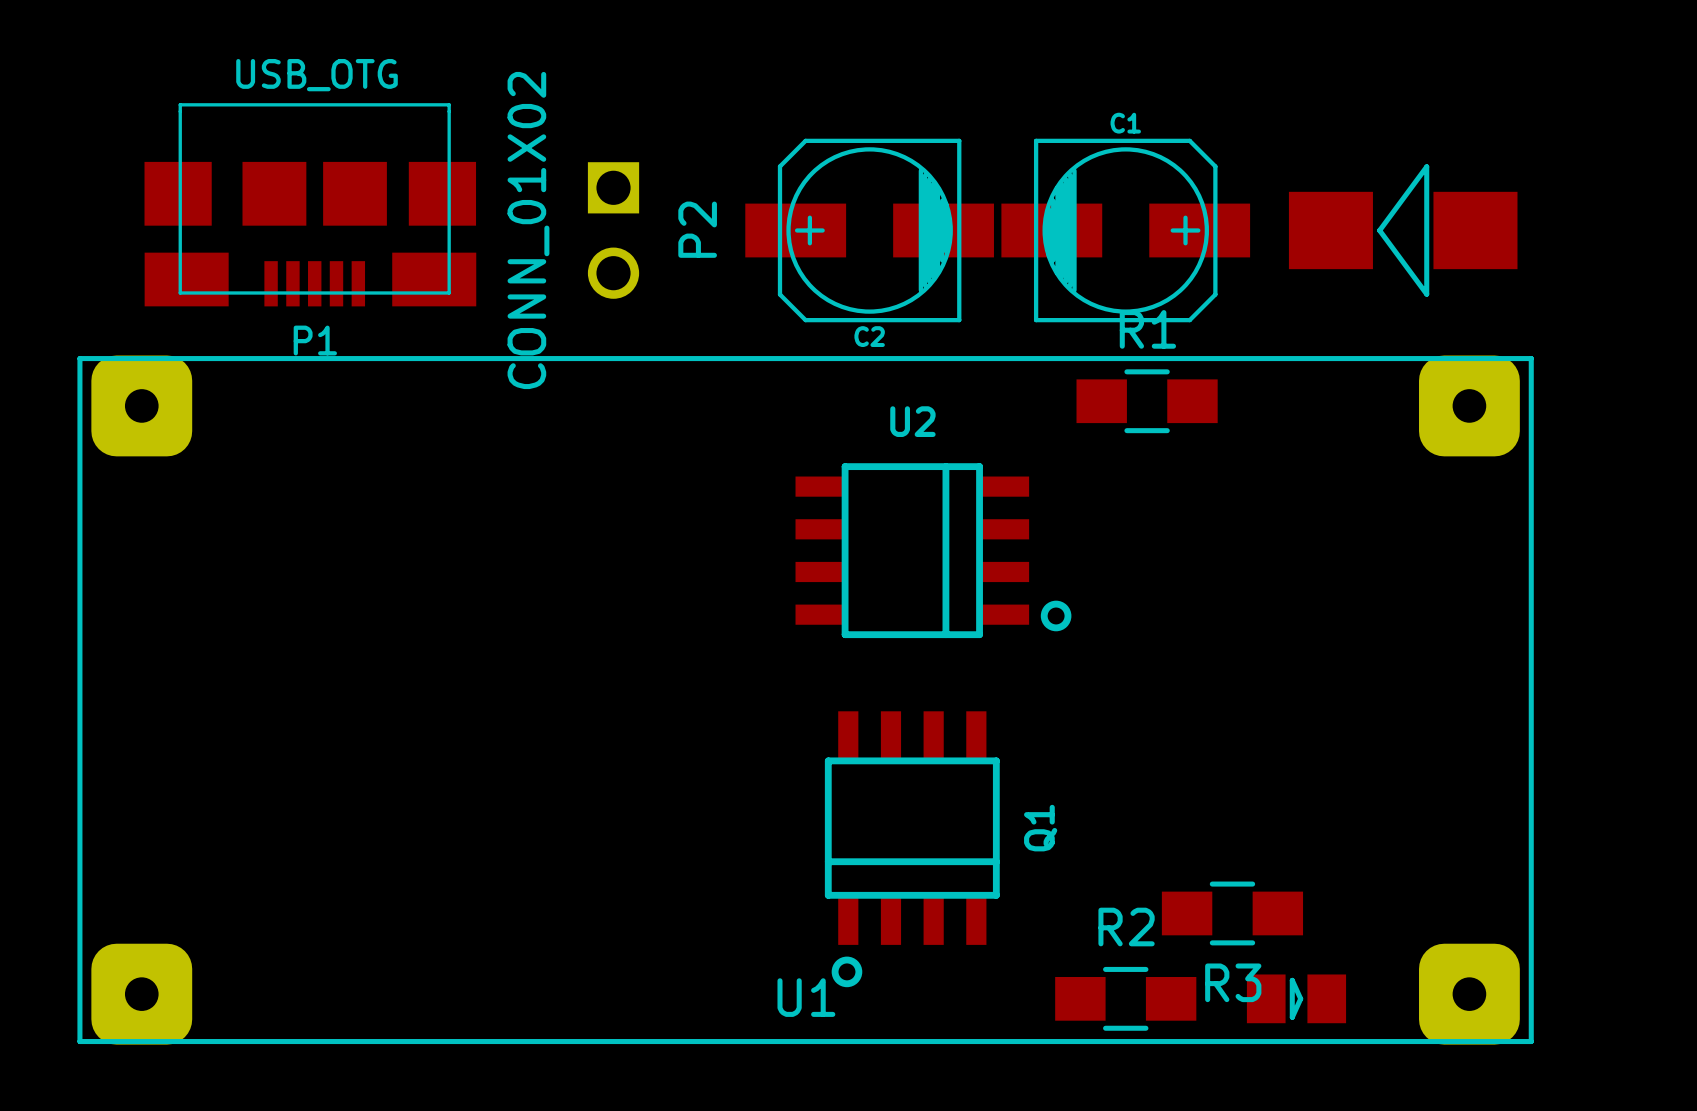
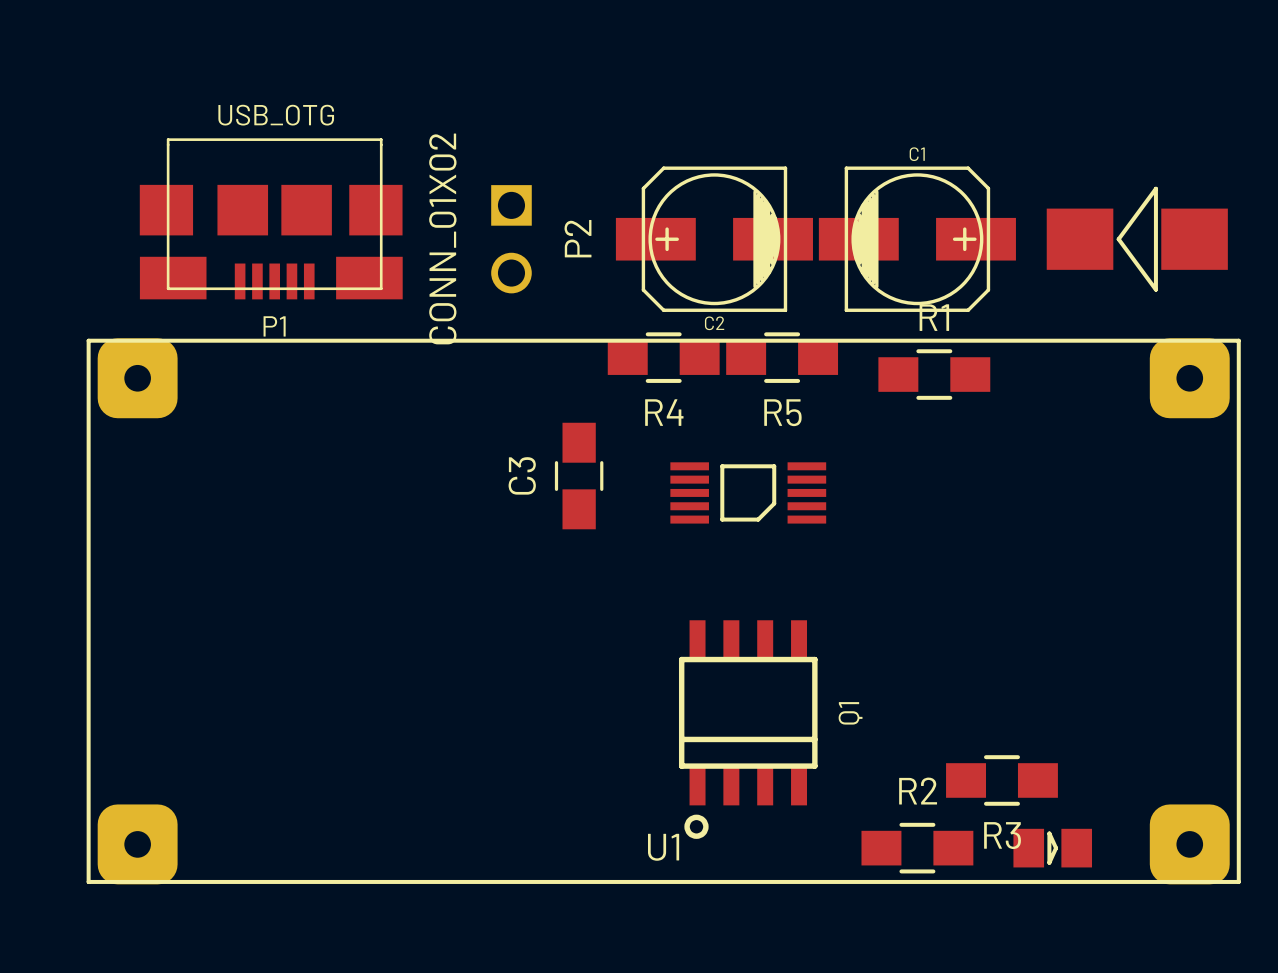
R4: none -> (663, 357)
R5: none -> (782, 357)
C3: none -> (579, 476)
part: none -> (748, 492)
U2: (933, 550) -> none

